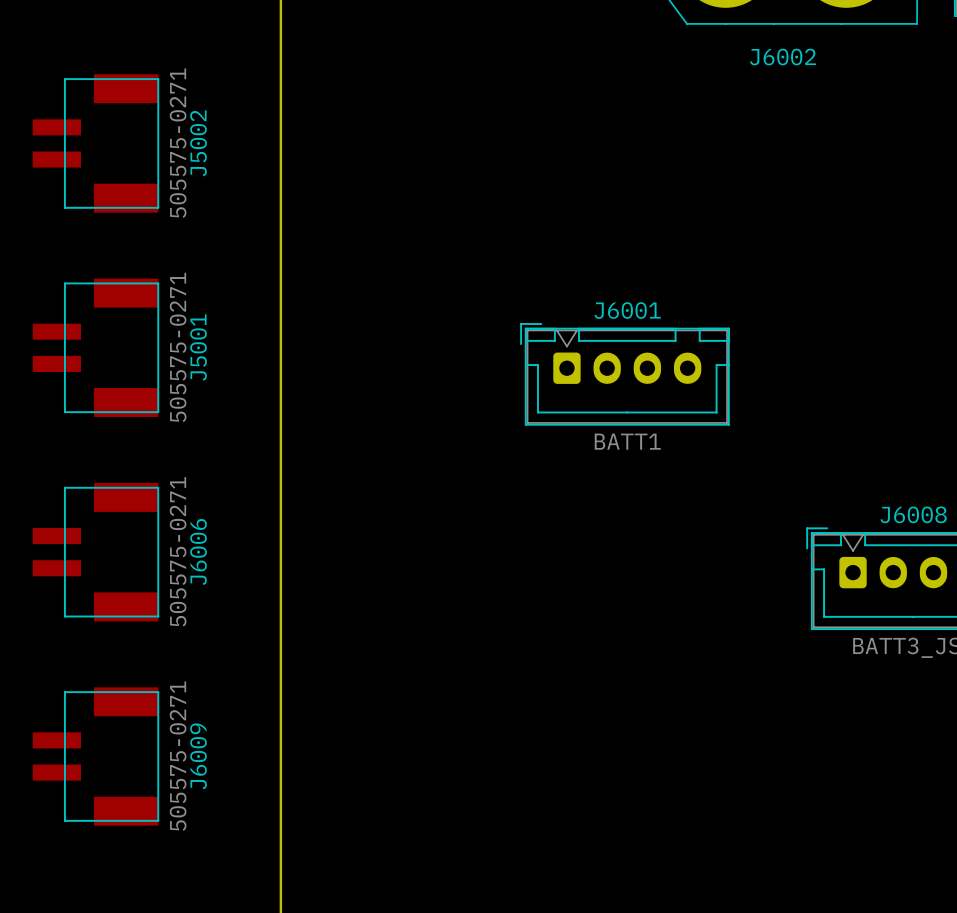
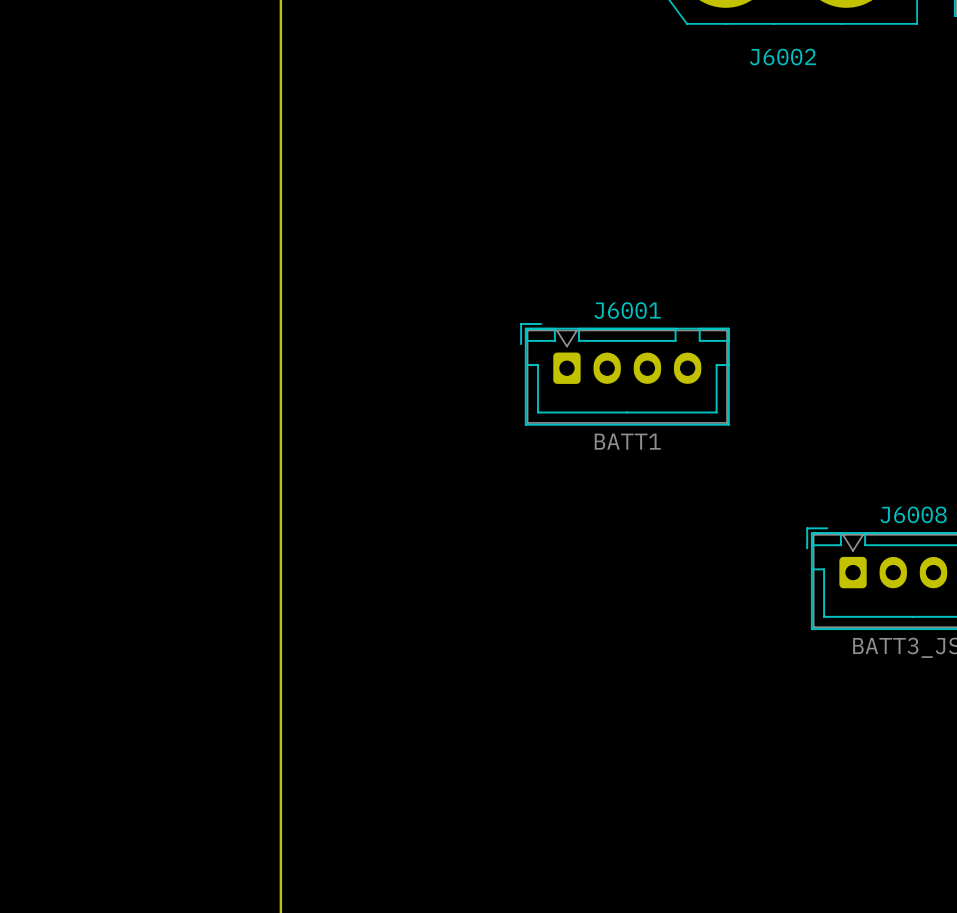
J5002: 505575-0271 (95, 143) -> none
J5001: 505575-0271 (95, 347) -> none
J6006: 505575-0271 (95, 552) -> none
J6009: 505575-0271 (95, 756) -> none

